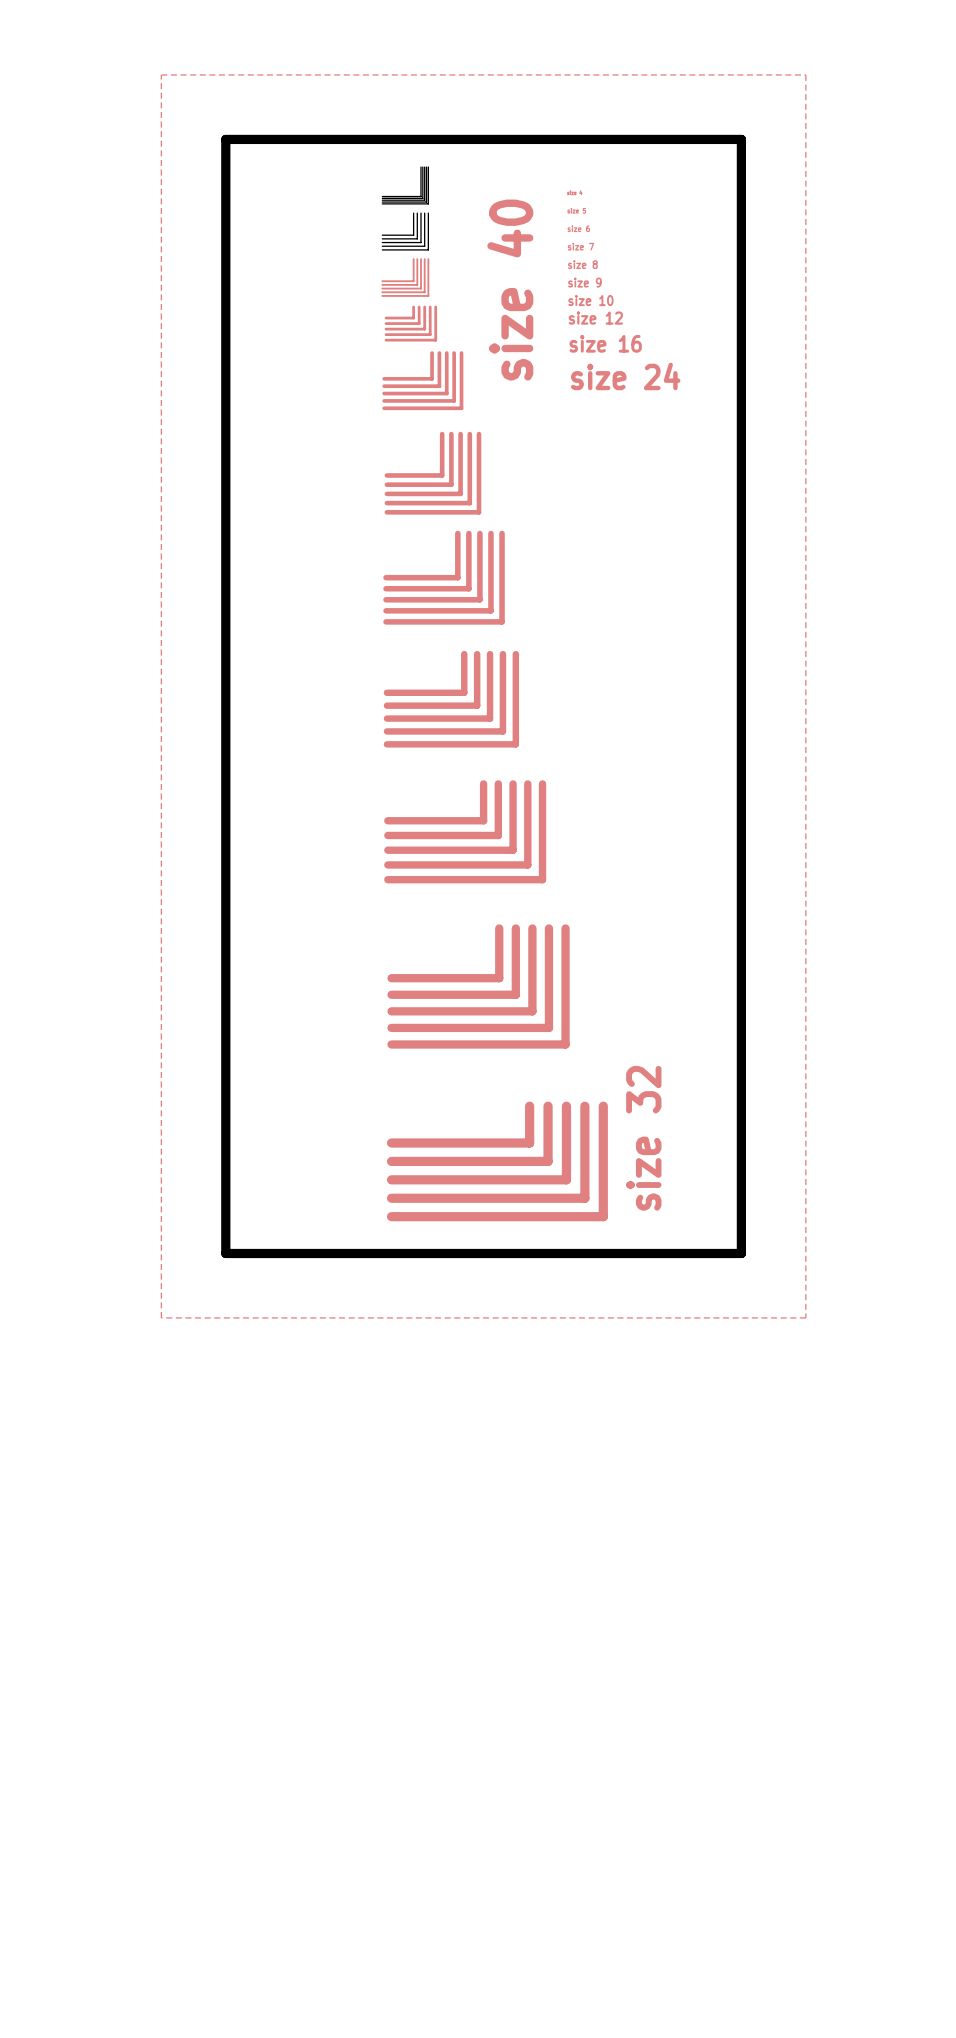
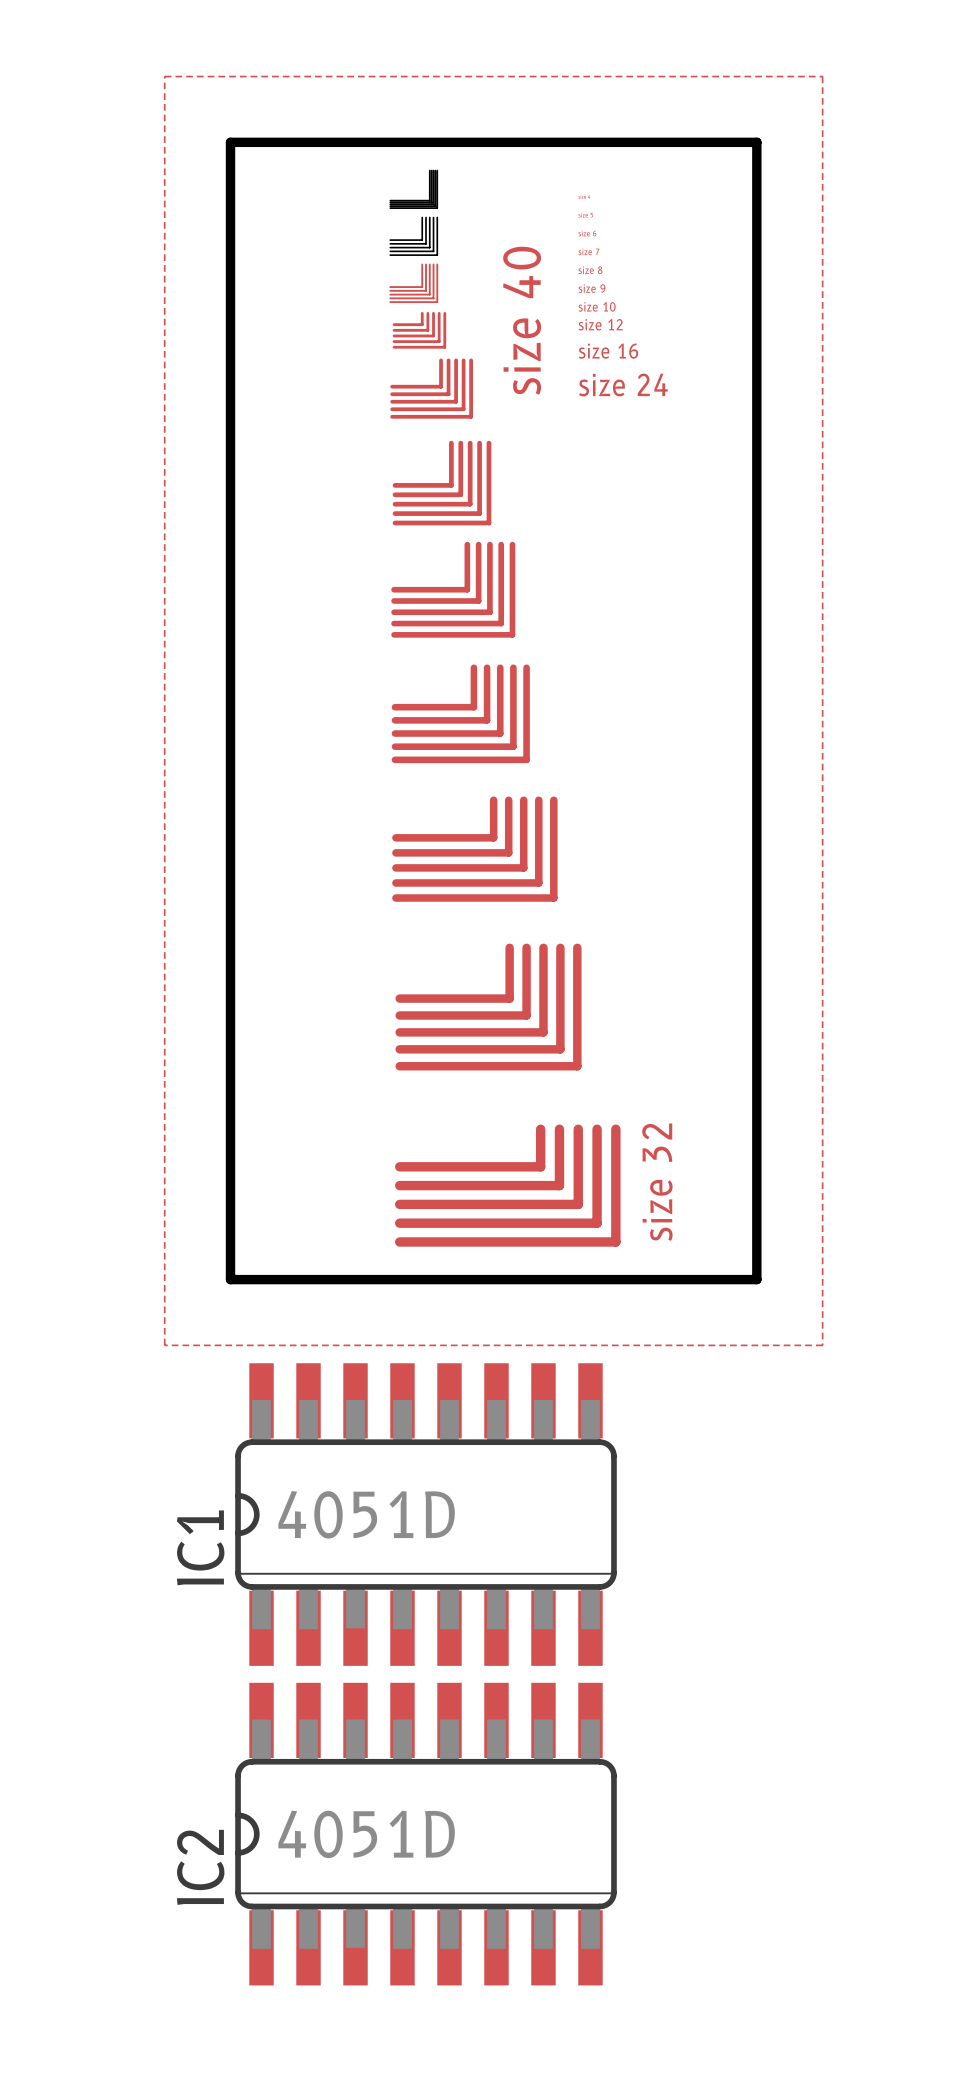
IC1: none -> 4051D (426, 1514)
IC2: none -> 4051D (426, 1834)

